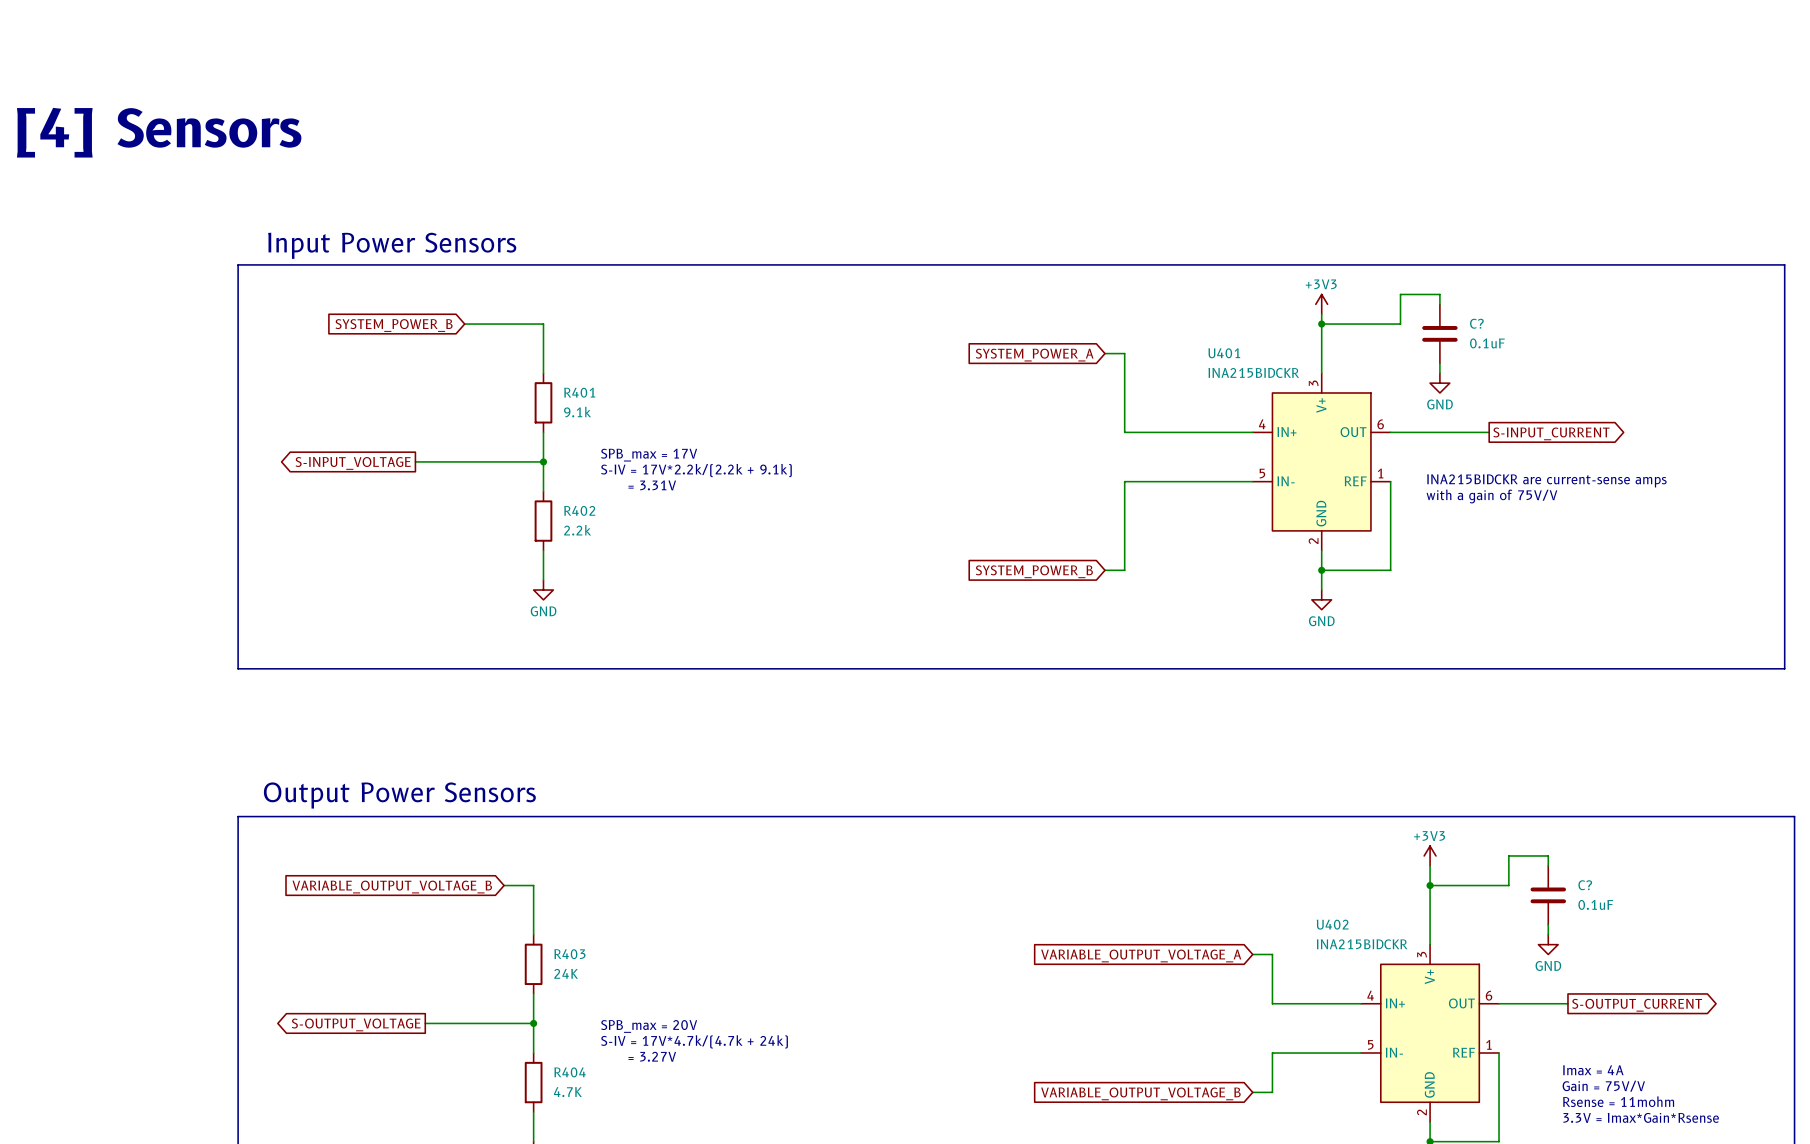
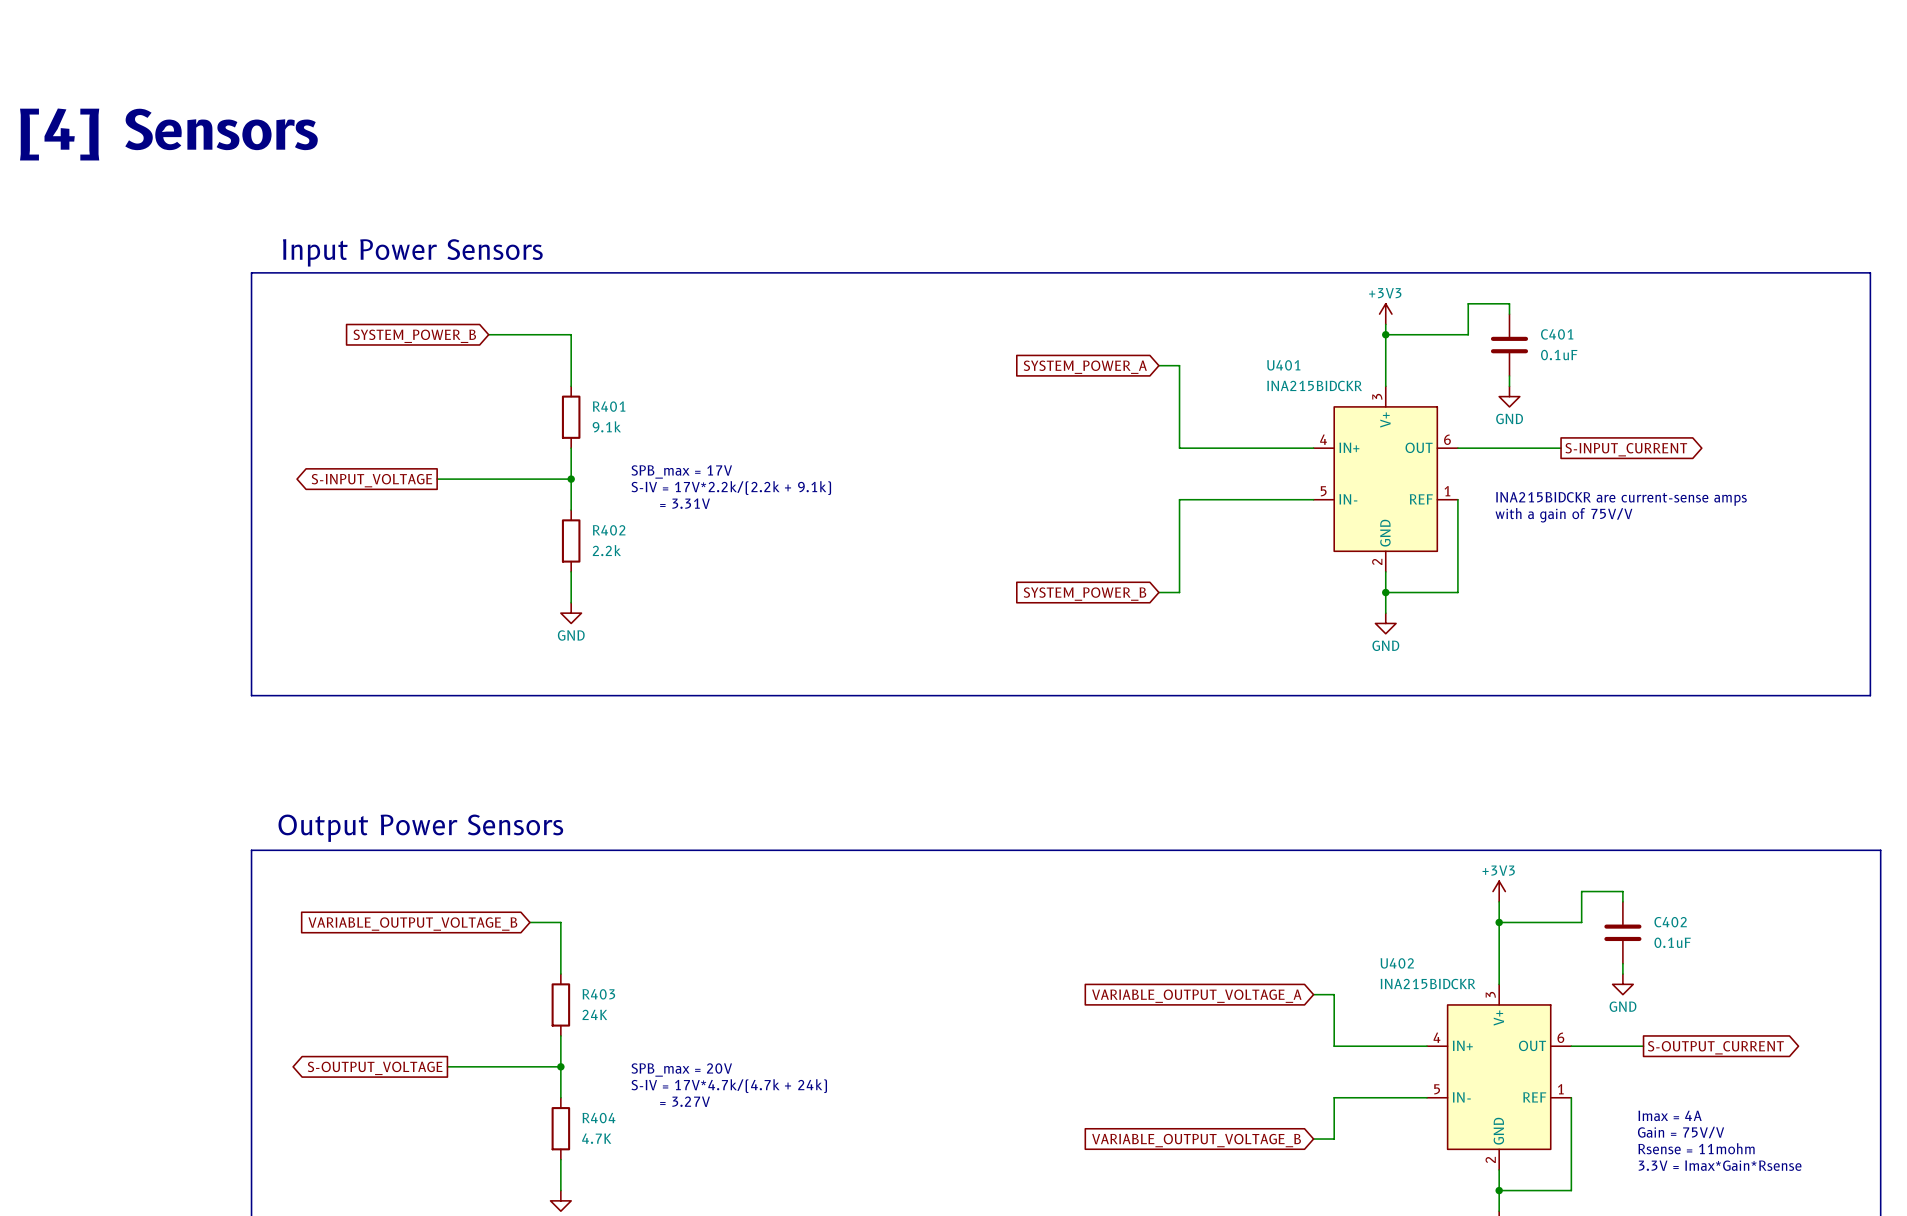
C? name: C? (1476, 323) -> C401 (1557, 334)
C? name: C? (1585, 885) -> C402 (1670, 922)

